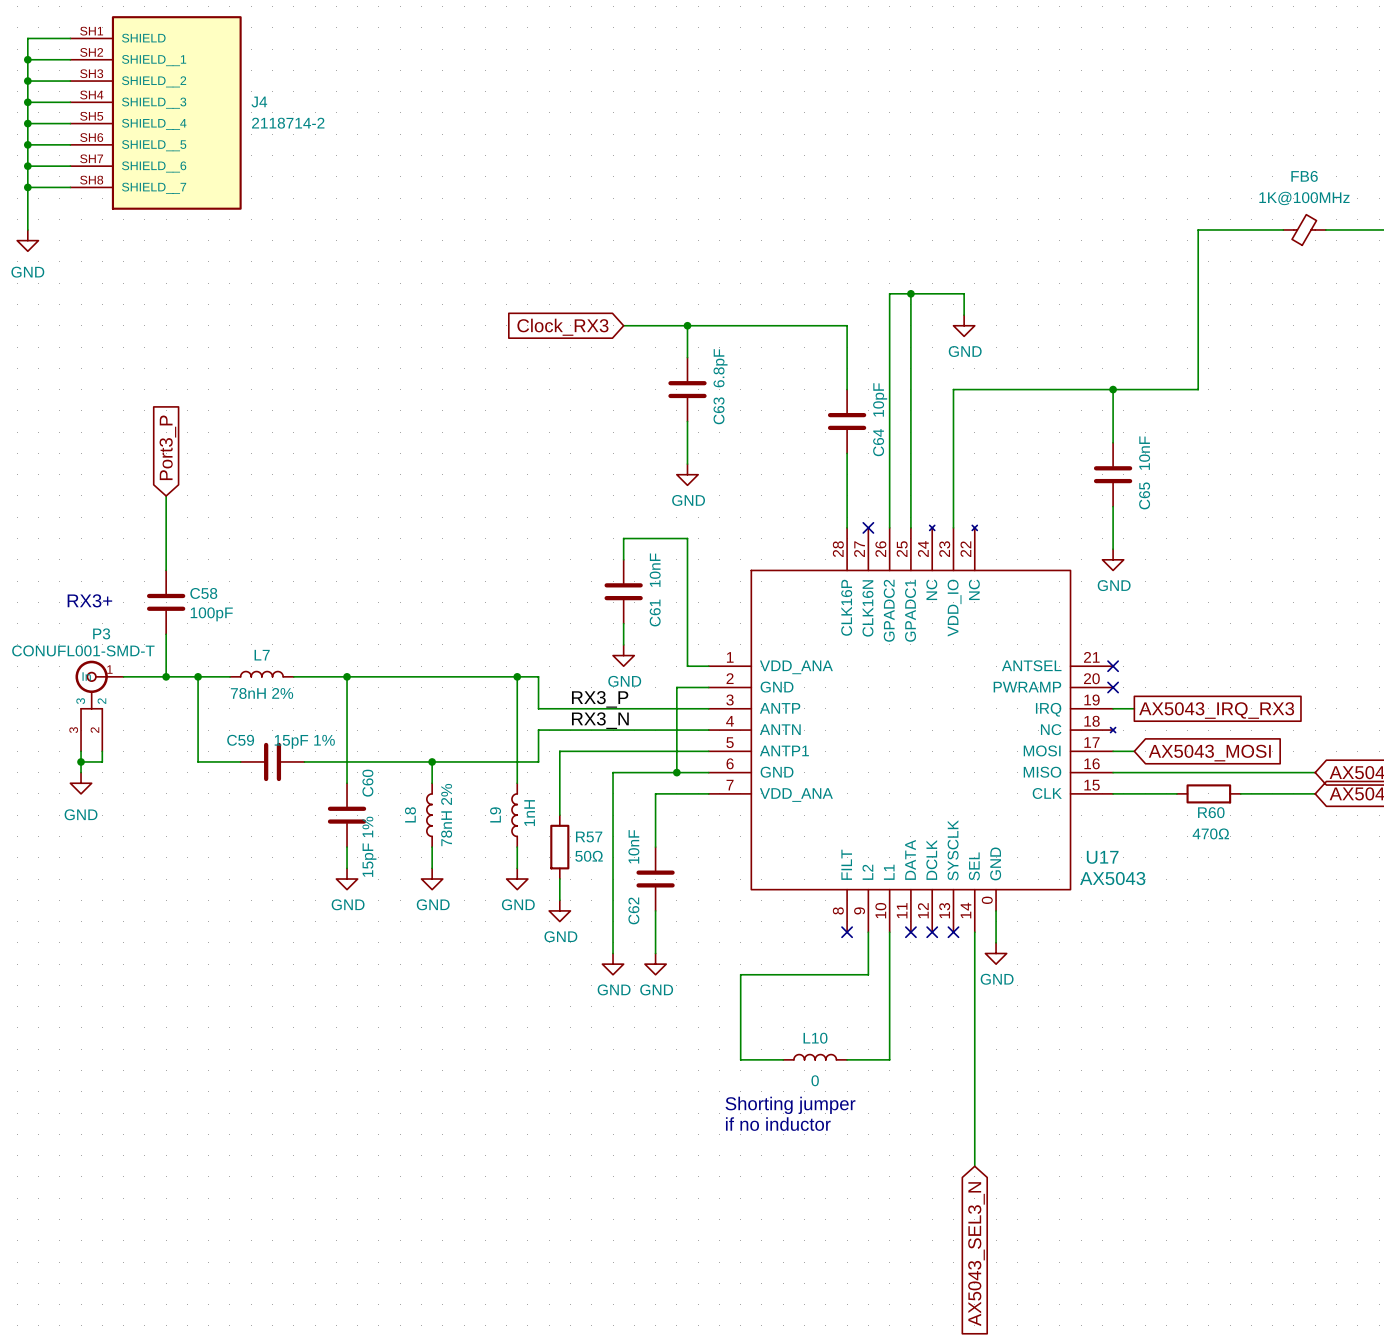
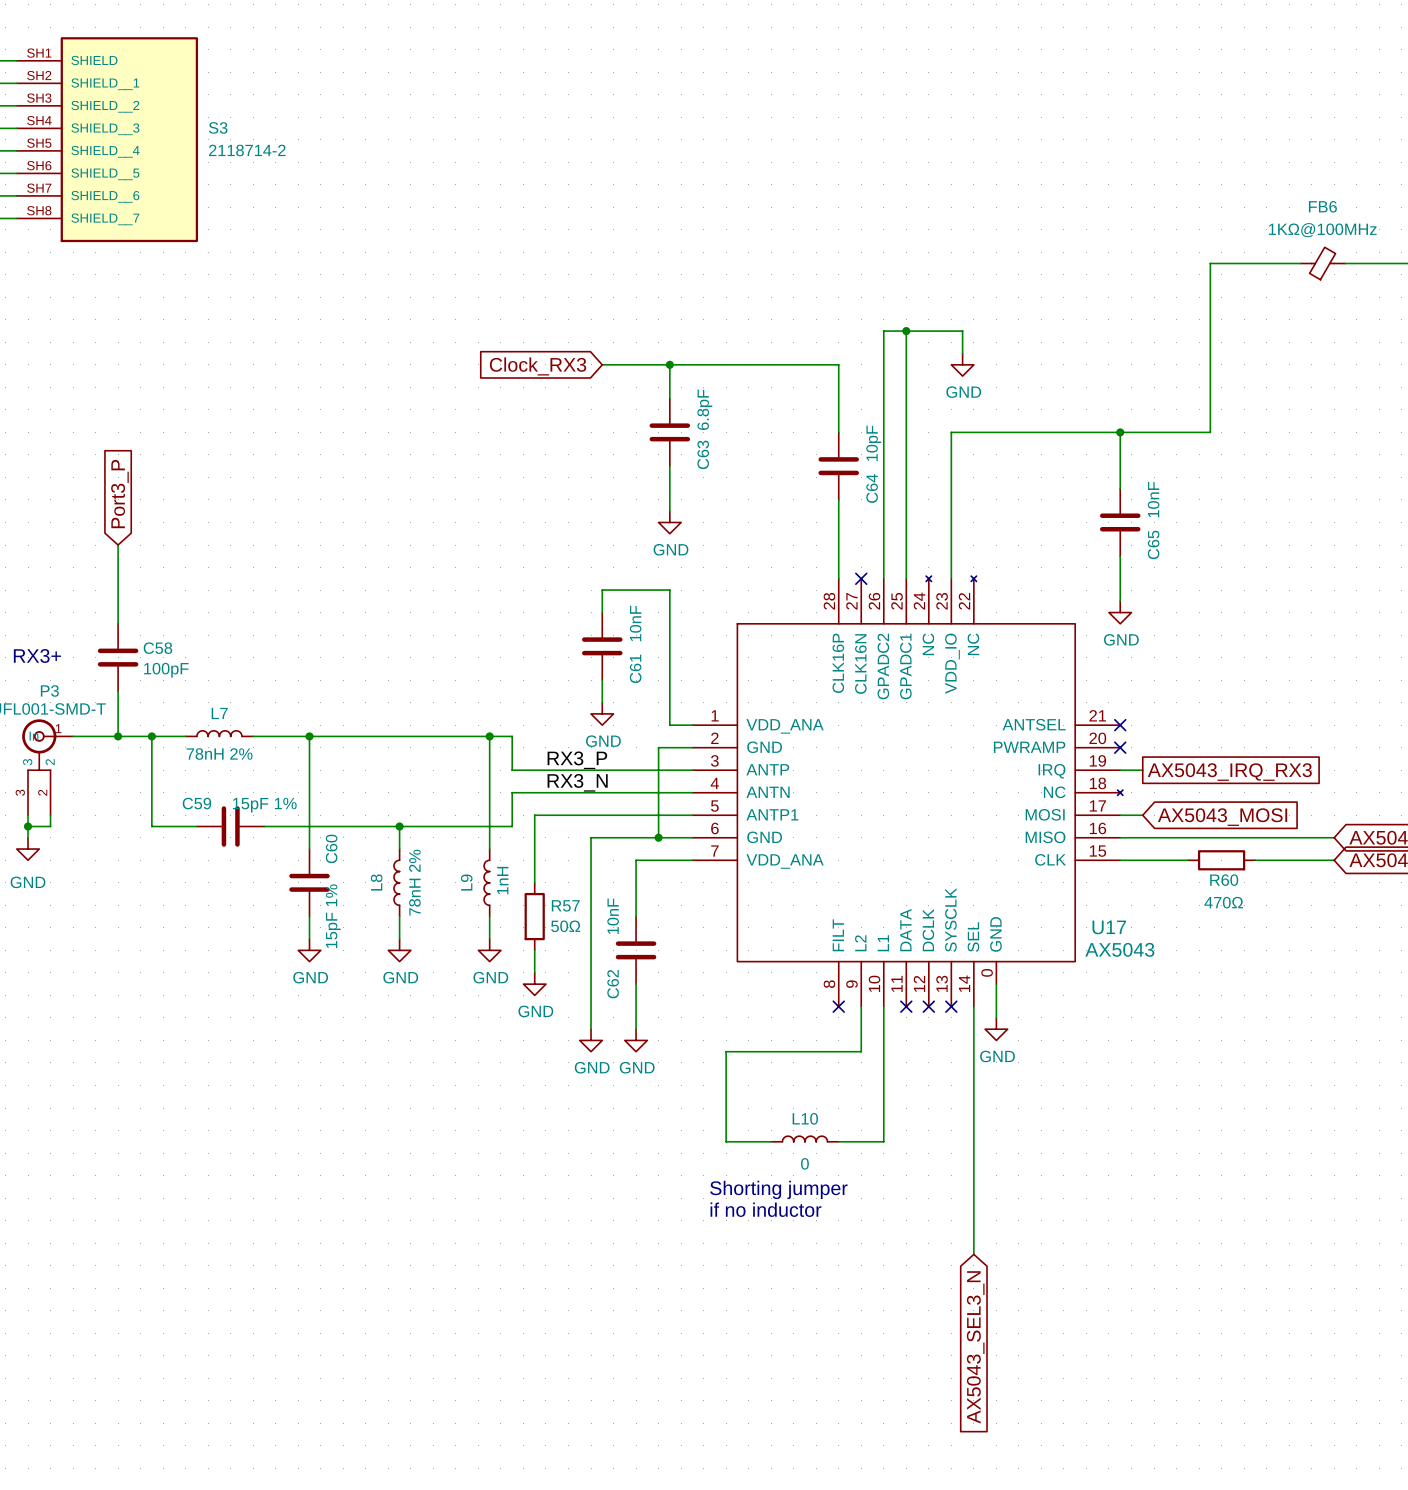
J4 name: J4 (259, 101) -> S3 (218, 127)
FB6 value: 1K@100MHz (1304, 198) -> 1KΩ@100MHz (1322, 230)

